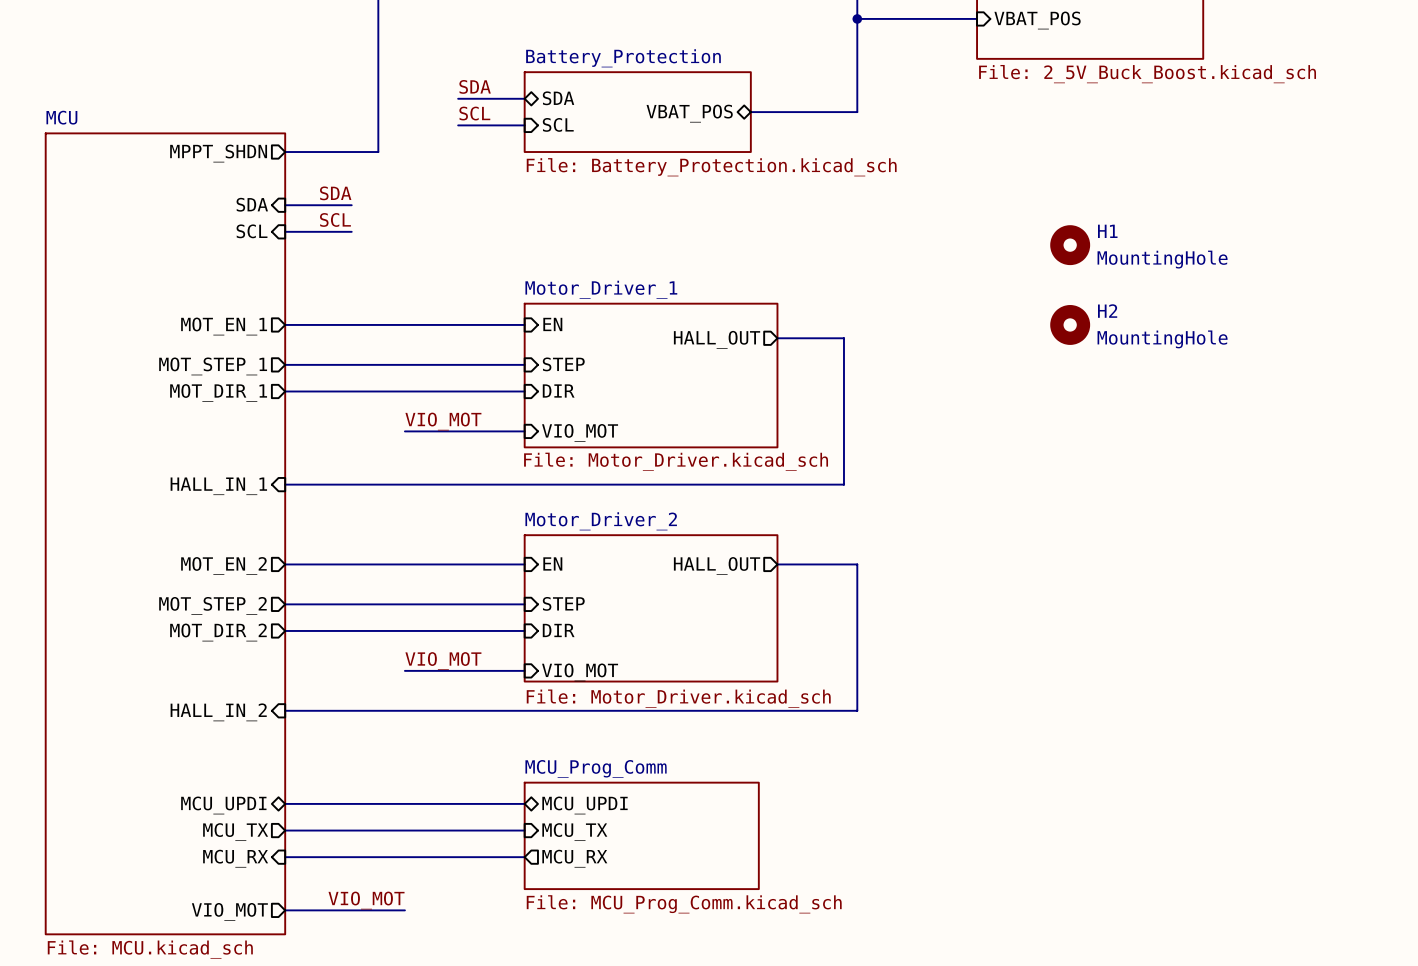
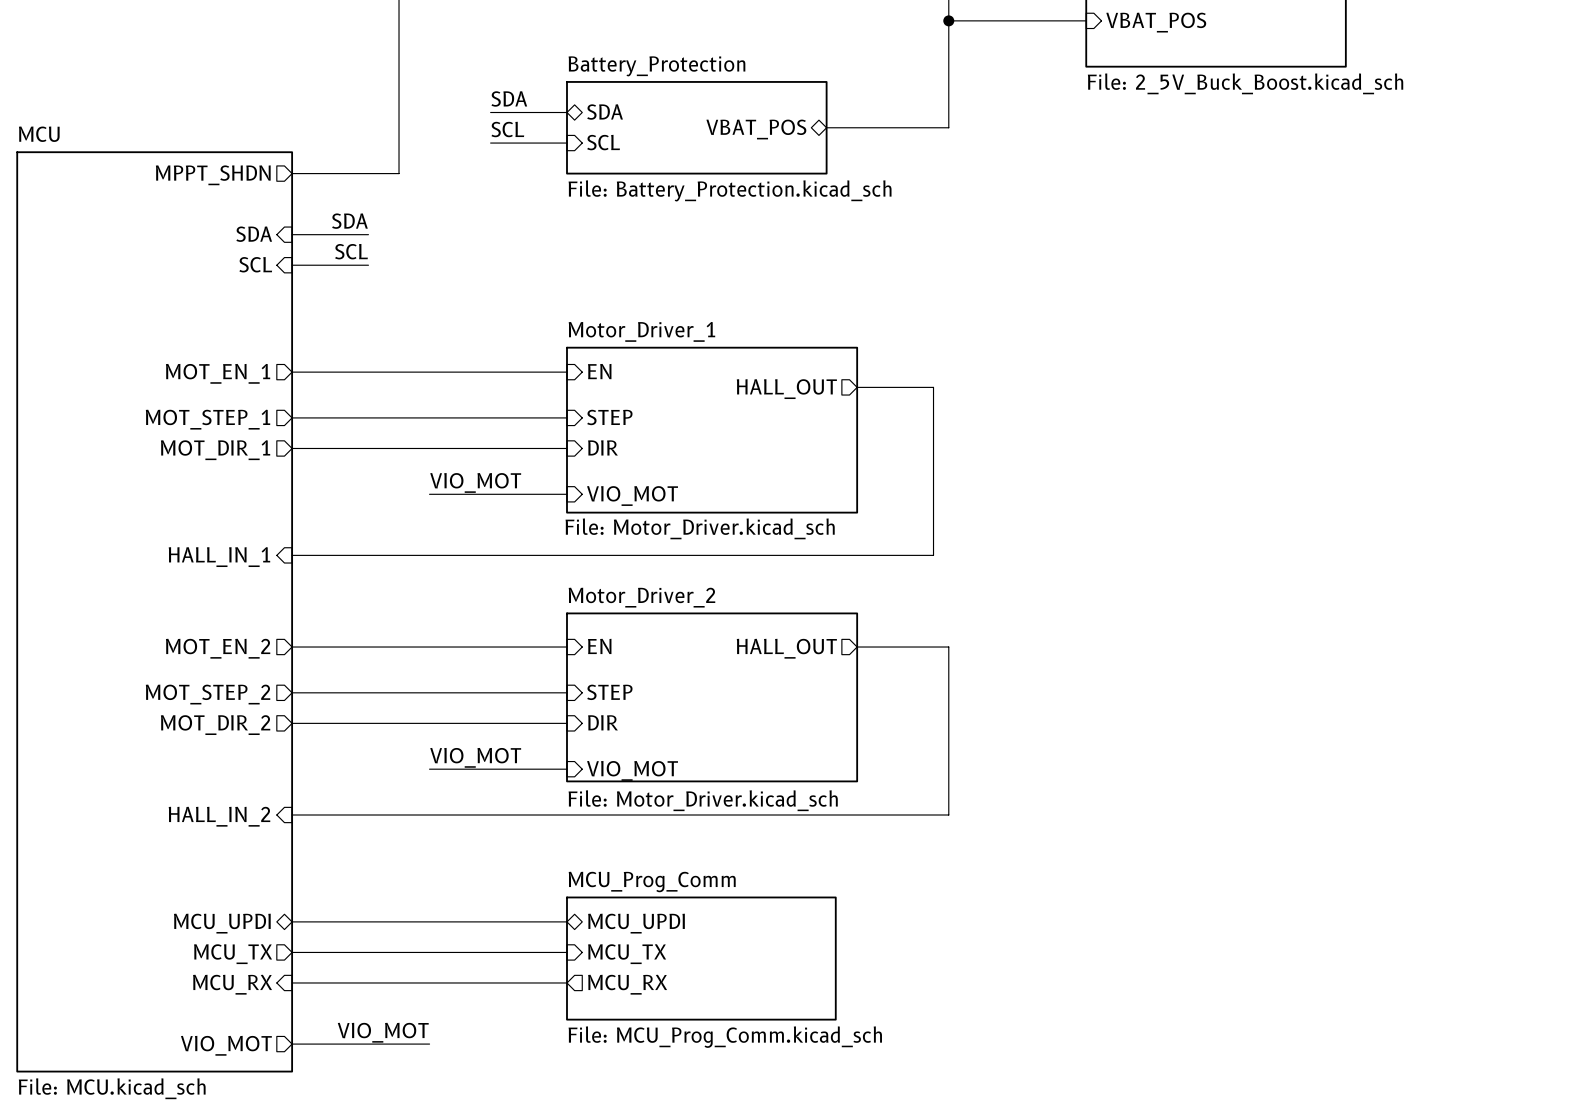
H1: MountingHole (1070, 245) -> none
H2: MountingHole (1070, 324) -> none

